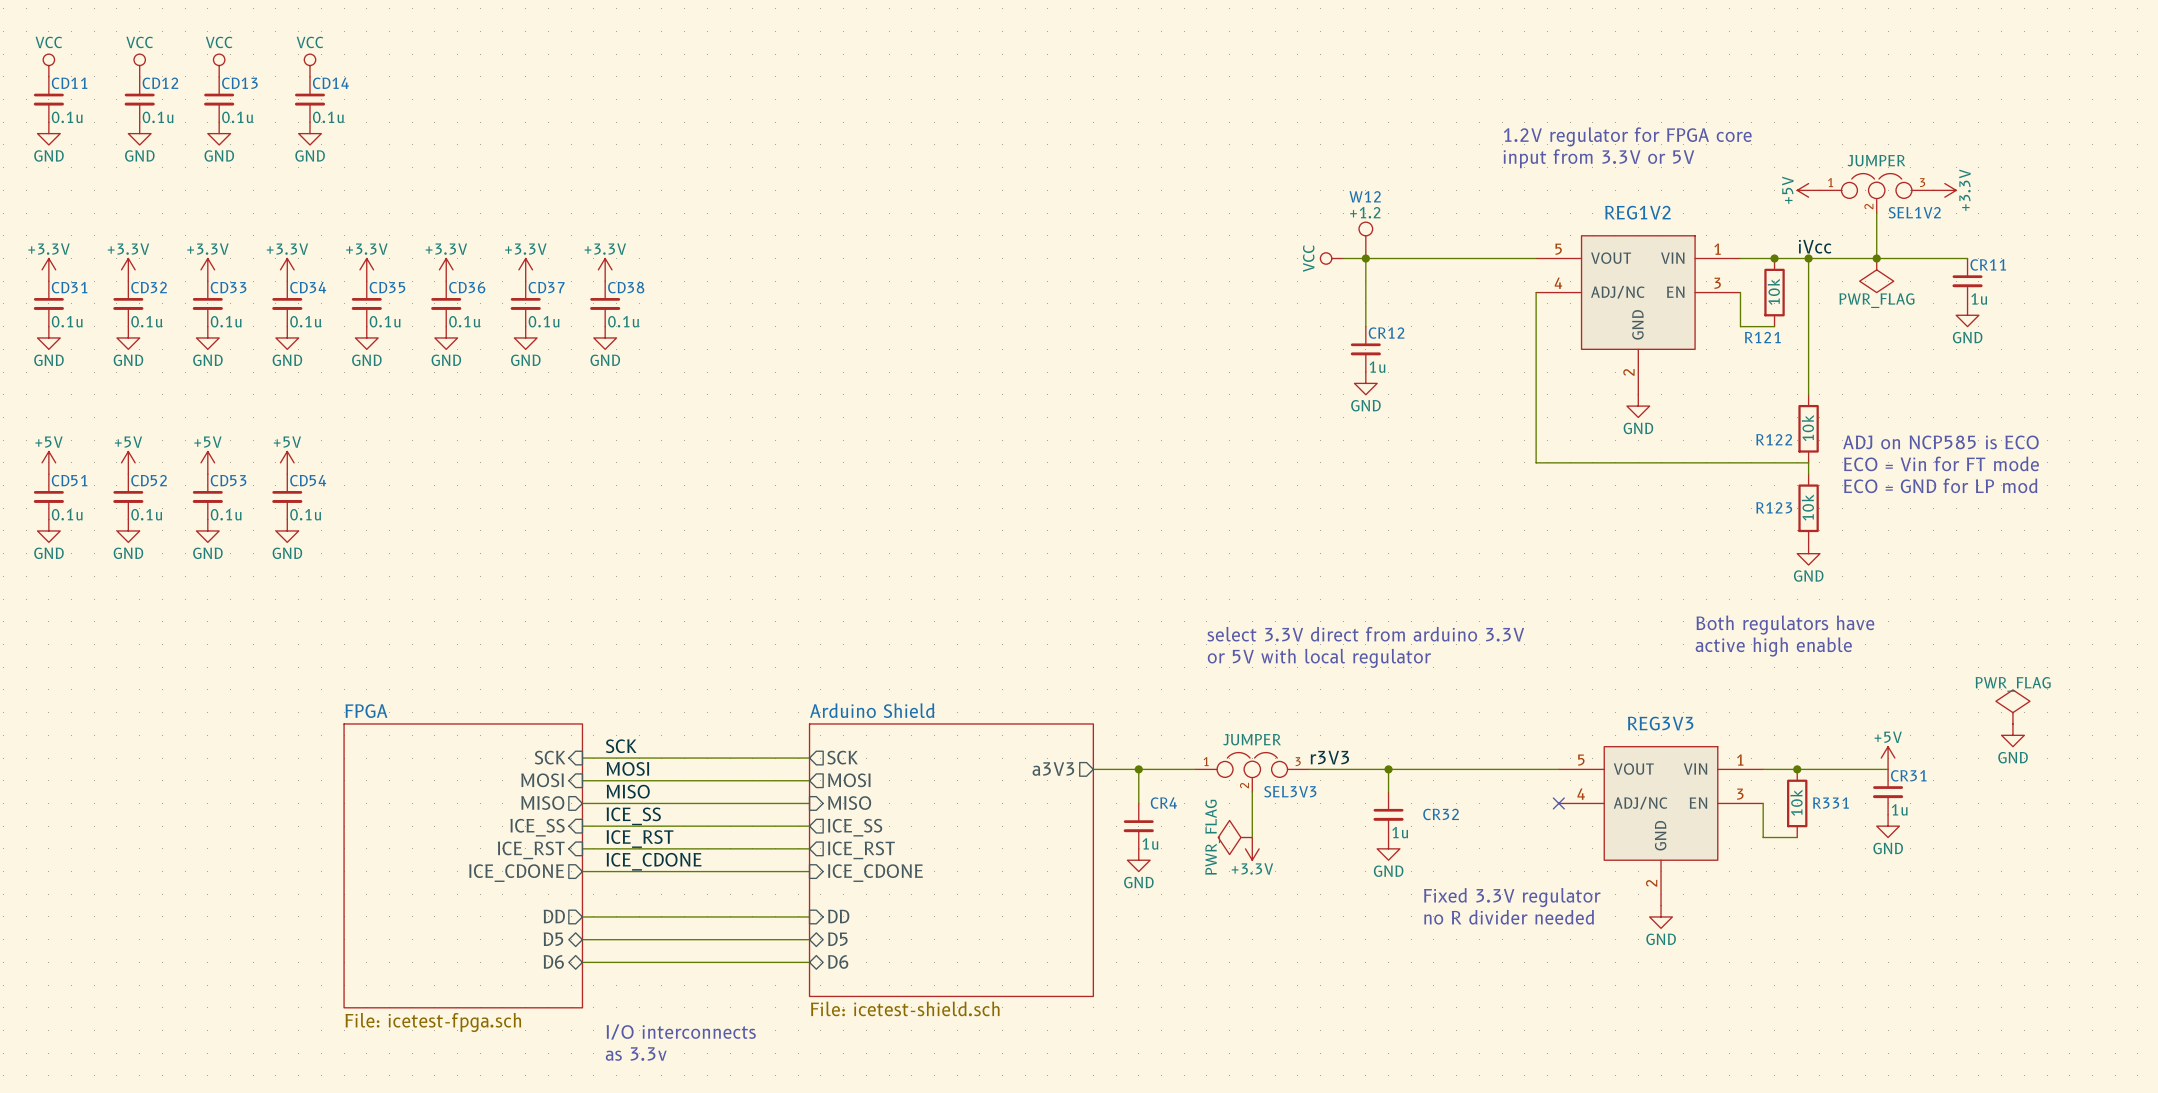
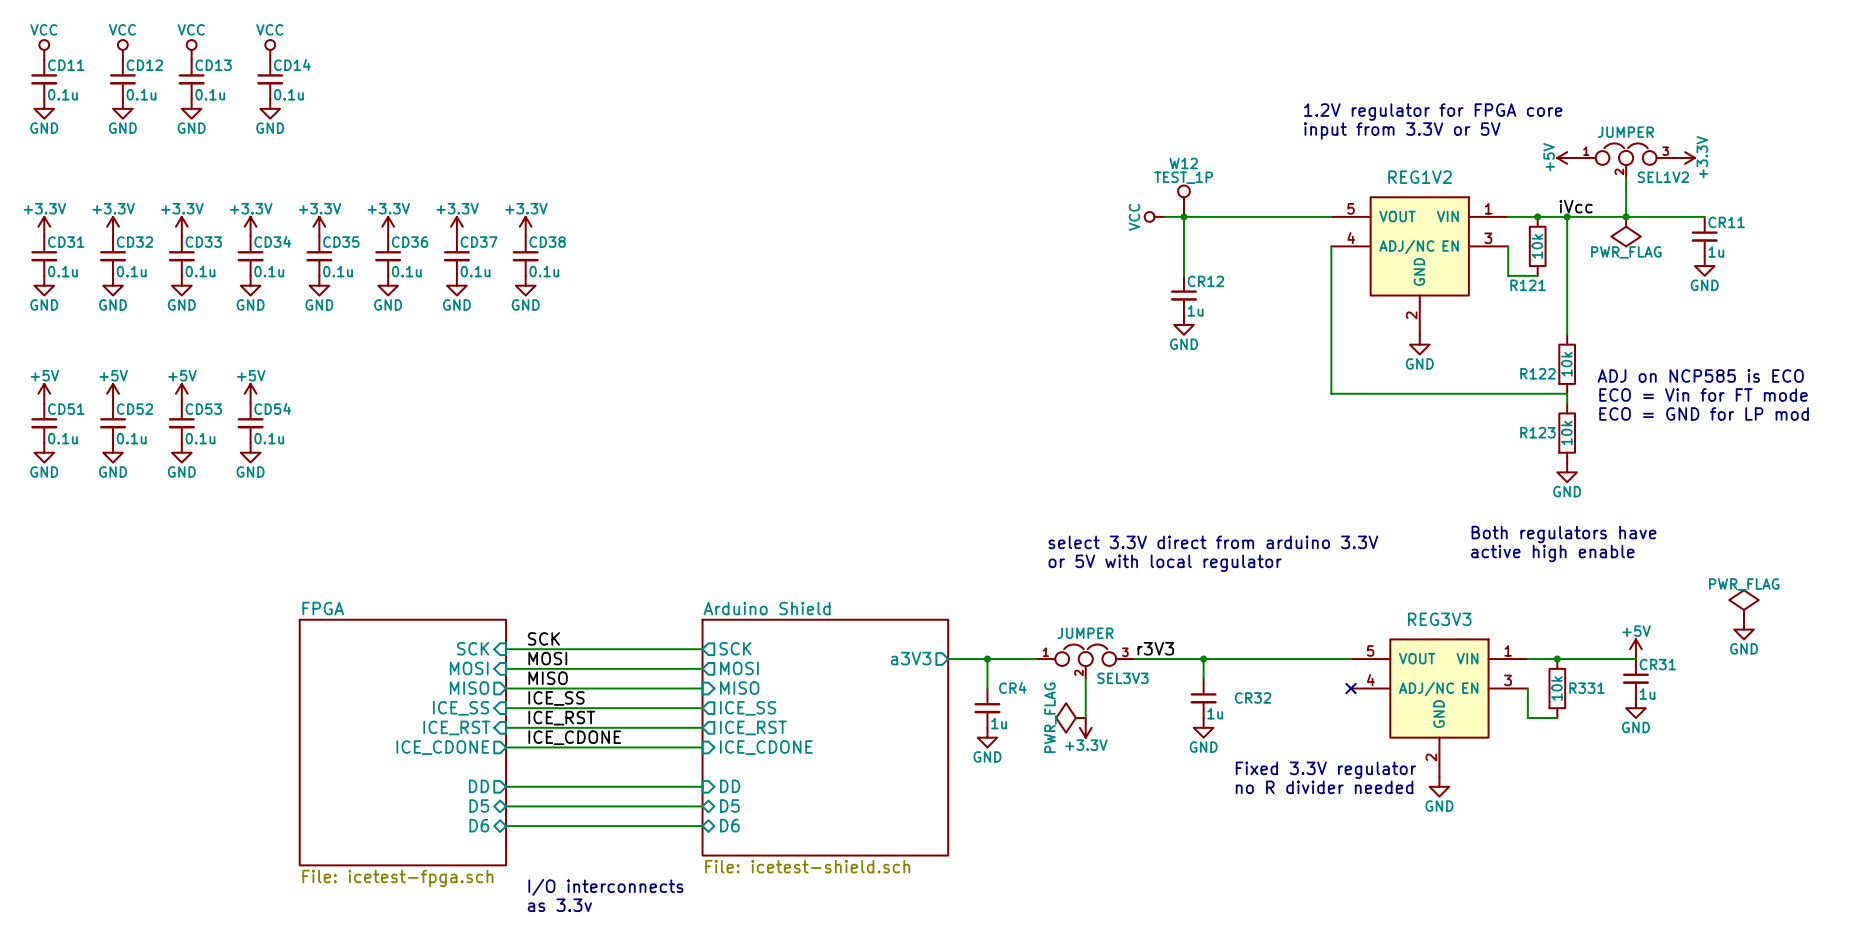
W12 value: +1.2 (1365, 212) -> TEST_1P (1183, 177)

